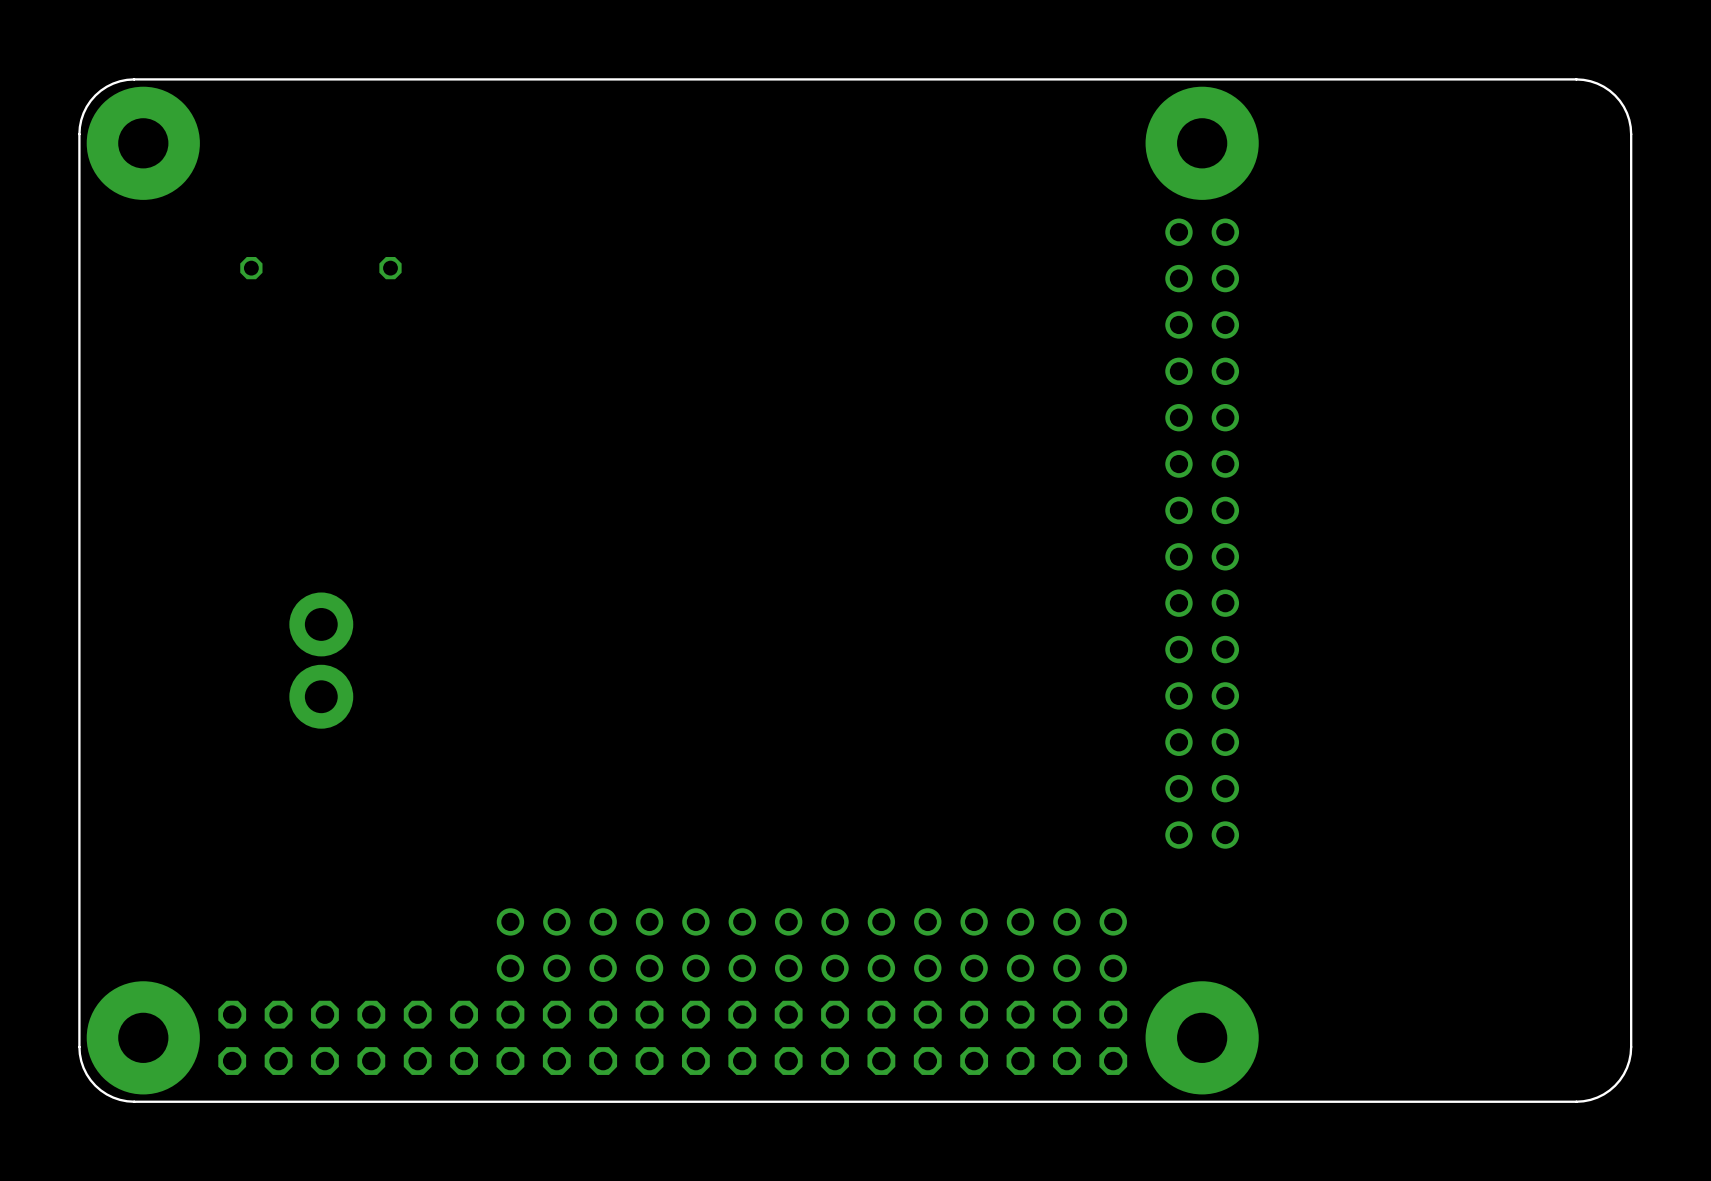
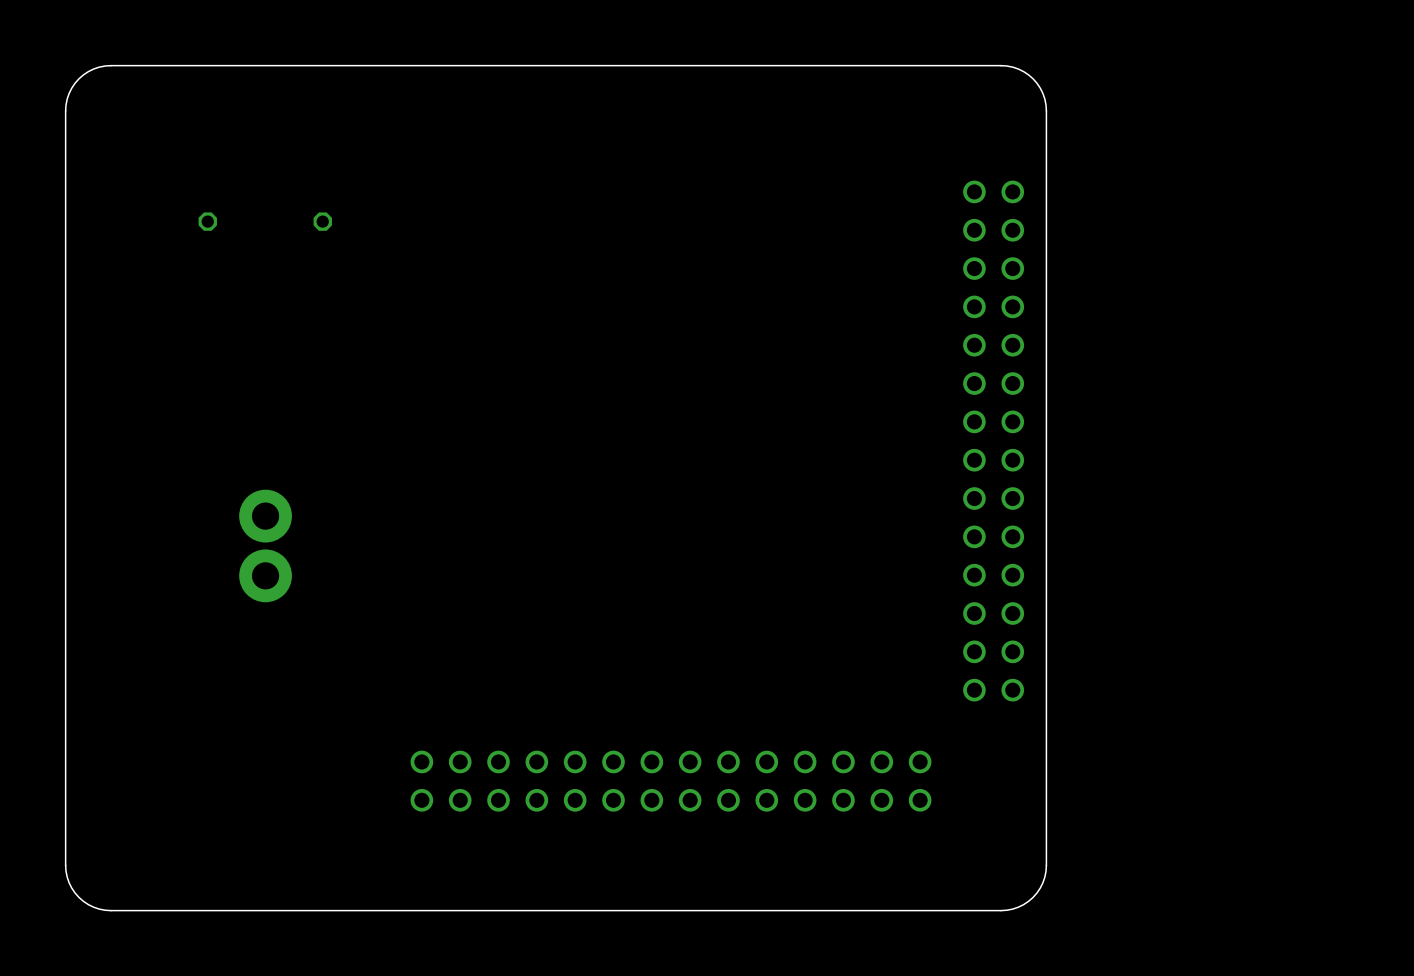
board edge: none -> (1001, 65) (110, 65) (93, 69) (78, 78) (69, 93) (65, 110) (65, 865) (69, 882) (78, 897) (93, 907) (110, 910) (1001, 910) (1018, 907) (1033, 897) (1042, 882) (1046, 865) (1046, 110) (1042, 93) (1033, 78) (1018, 69) (1001, 65)
part: (855, 590) -> none

